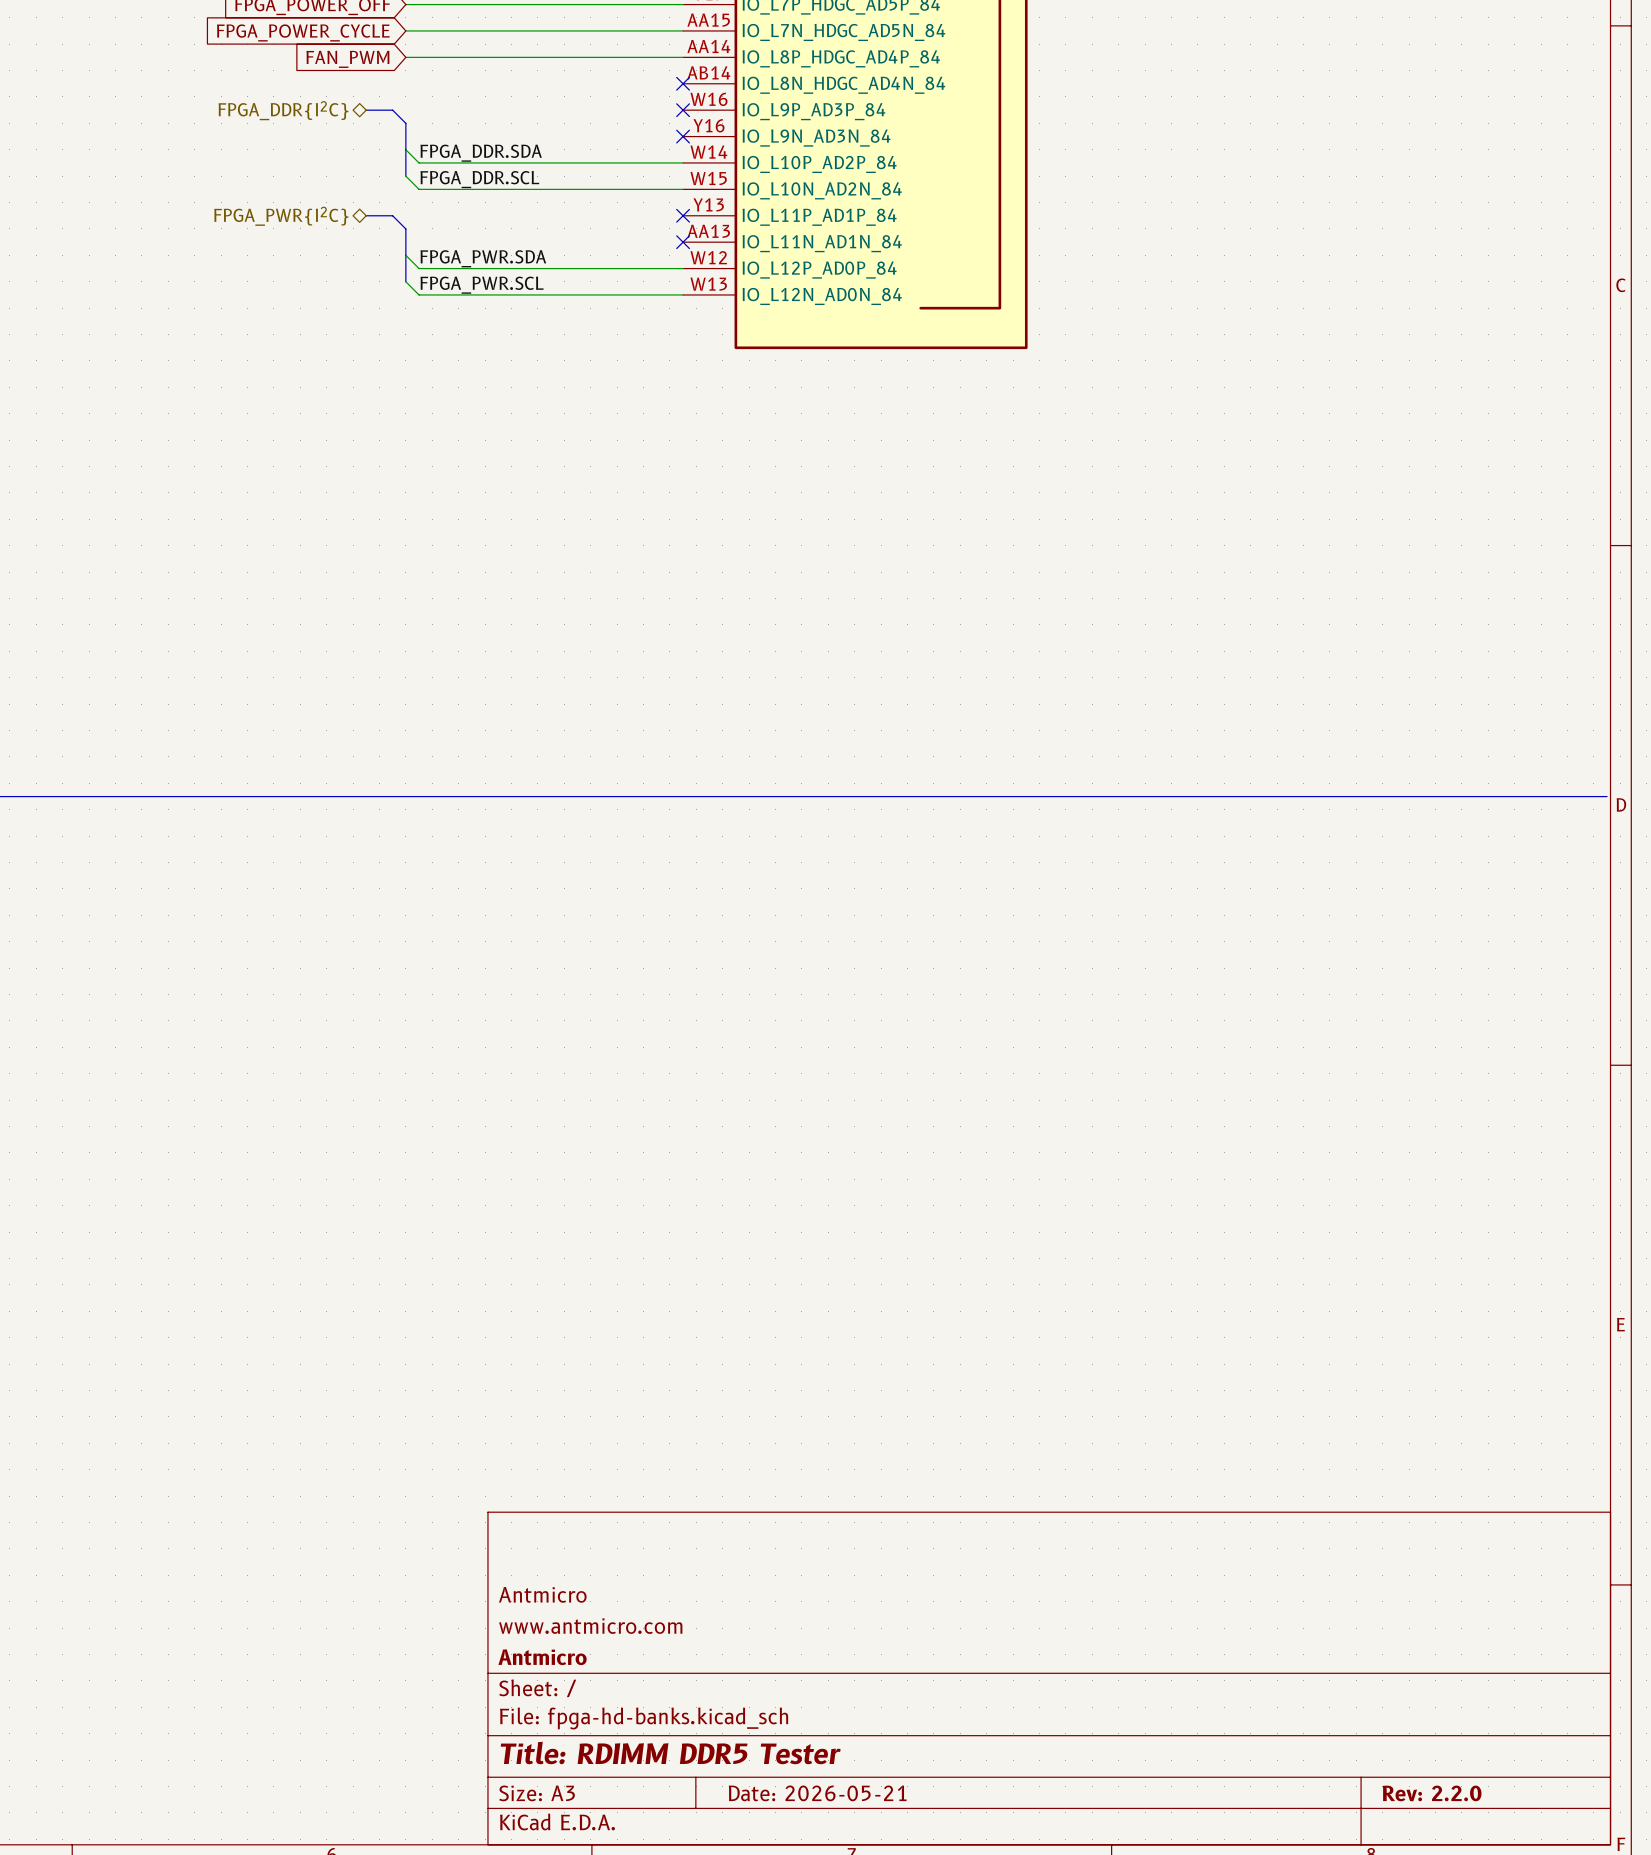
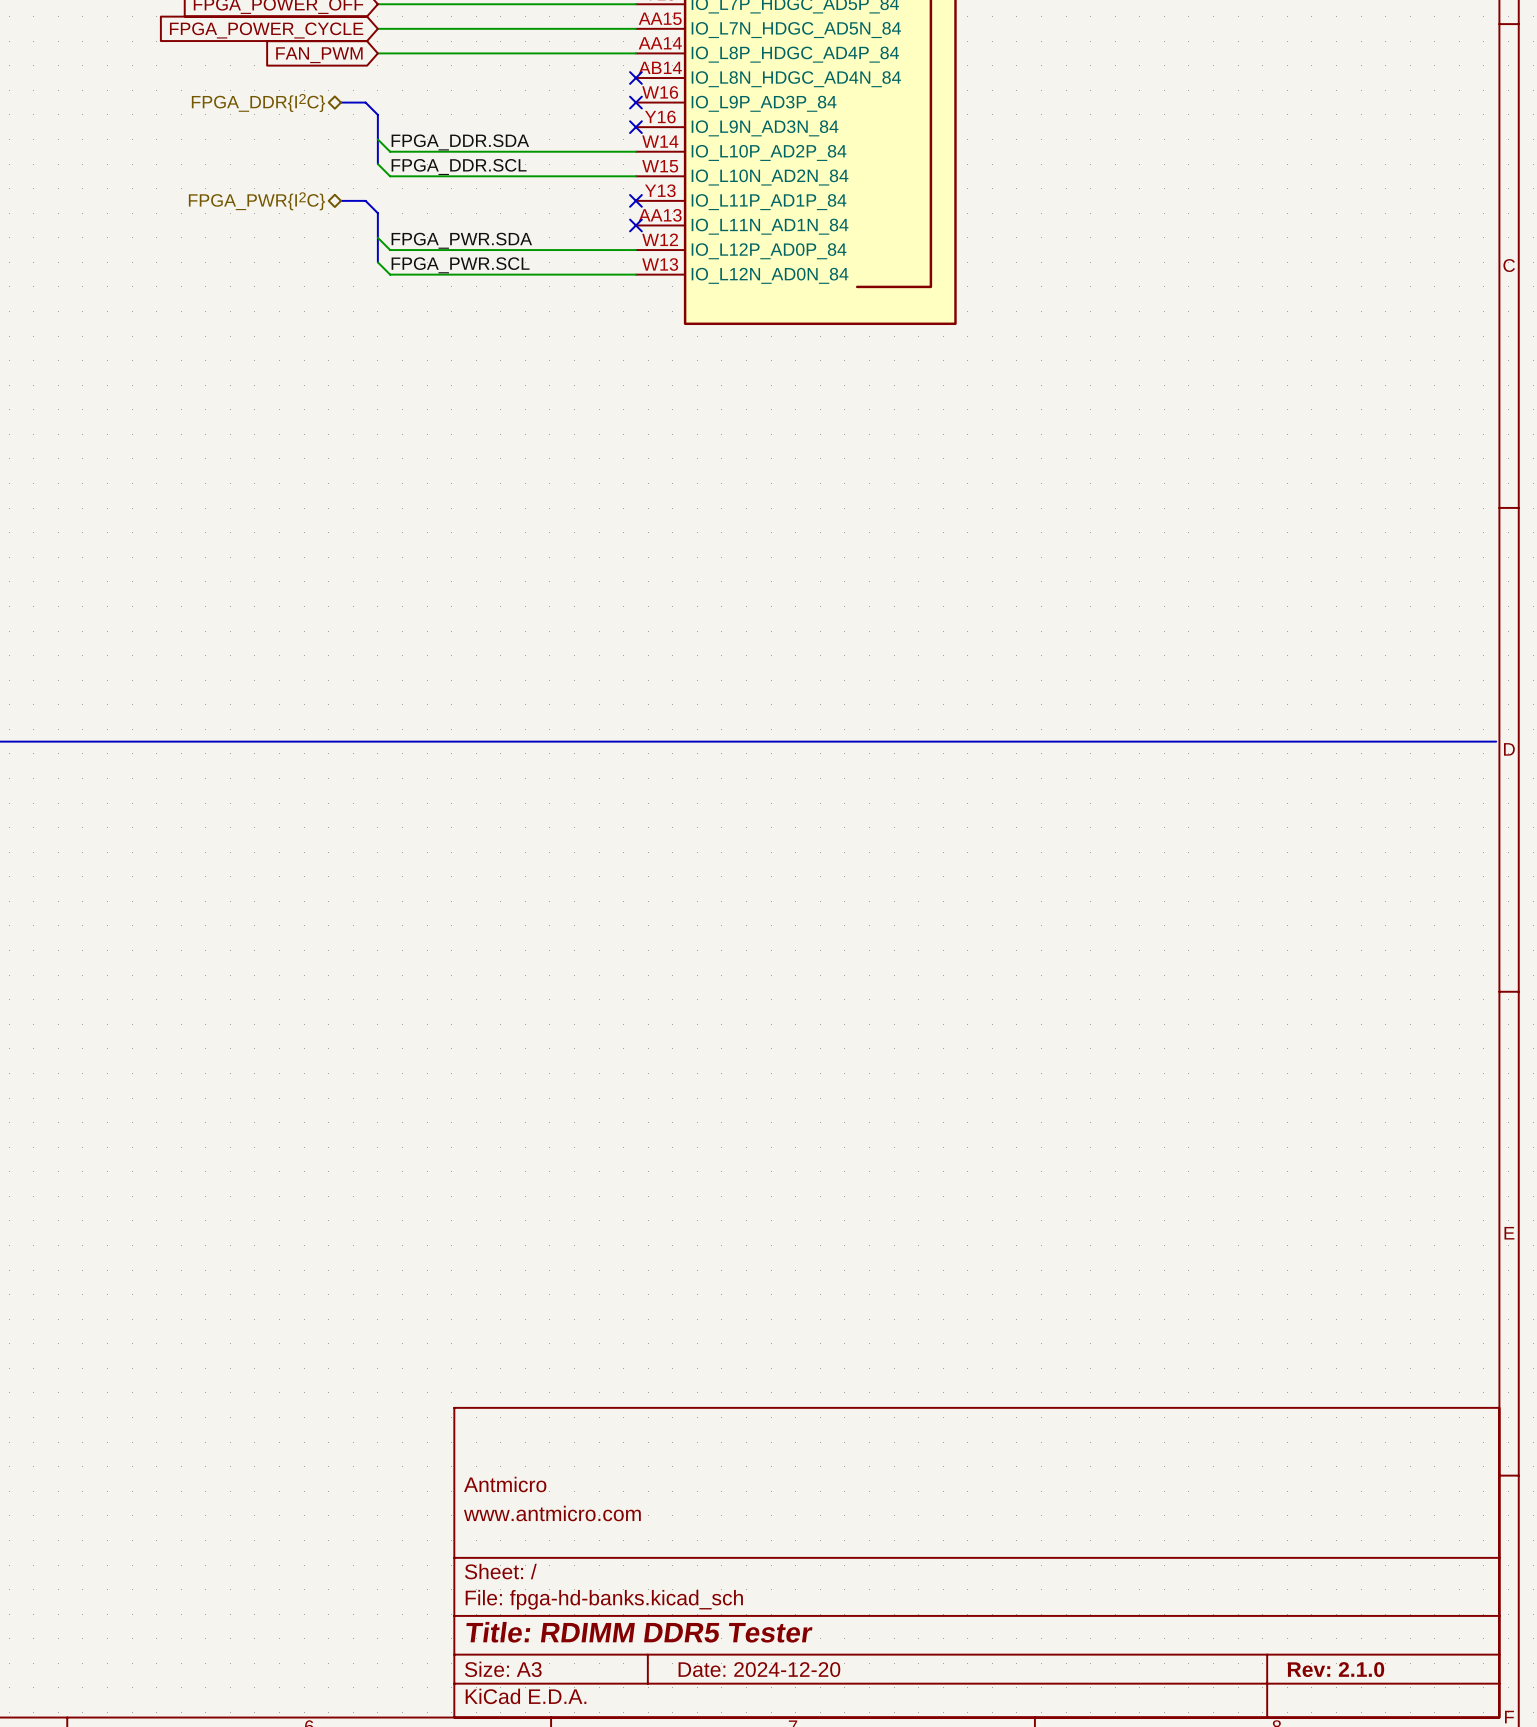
title block: Antmicro (542, 1657) -> none
title block: Date: 2026-05-21 (817, 1793) -> Date: 2024-12-20 (759, 1669)
title block: Rev: 2.2.0 (1432, 1793) -> Rev: 2.1.0 (1336, 1669)

